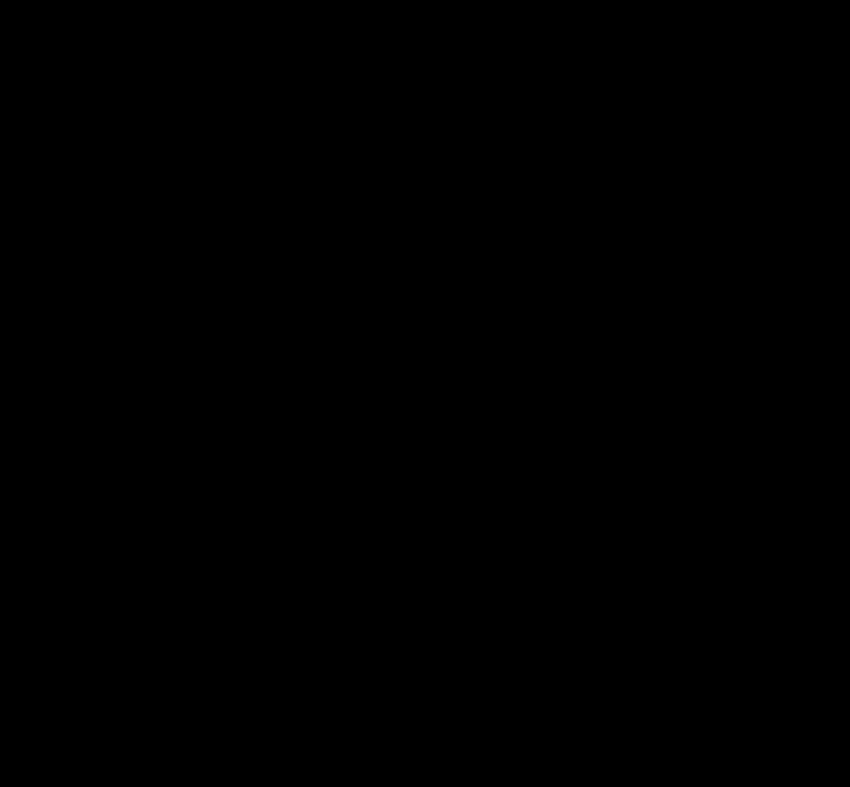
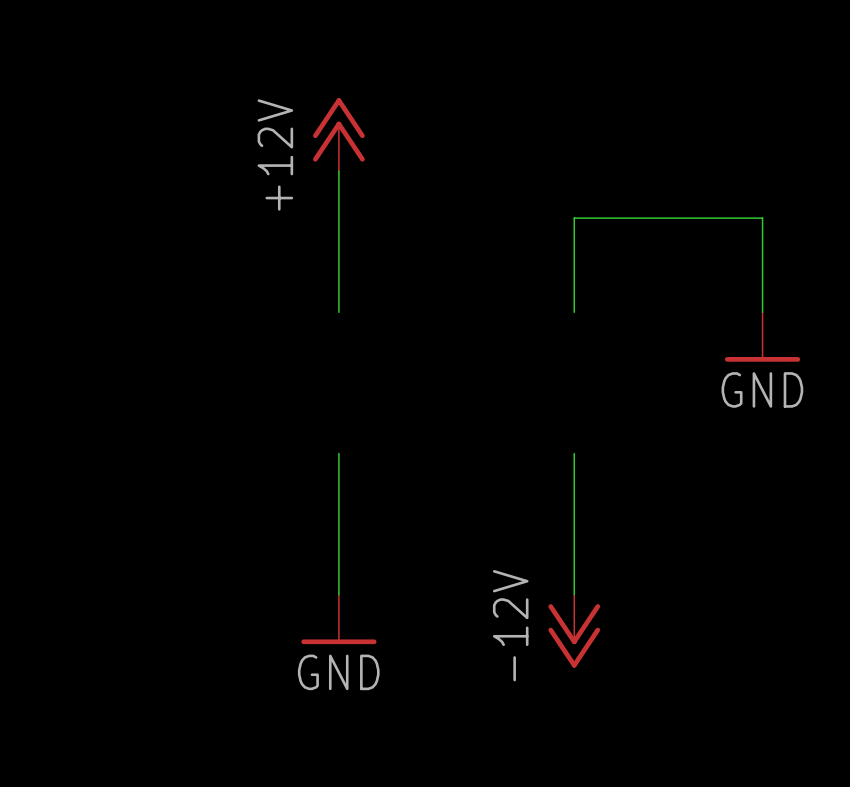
power symbol: none -> +12V (338, 134)
wire: none -> (338, 171) (338, 312)
wire: none -> (574, 312) (574, 218) (762, 218) (762, 312)
power symbol: none -> GND (762, 336)
wire: none -> (338, 453) (338, 594)
wire: none -> (574, 453) (574, 594)
power symbol: none -> GND (338, 619)
power symbol: none -> -12V (574, 631)

